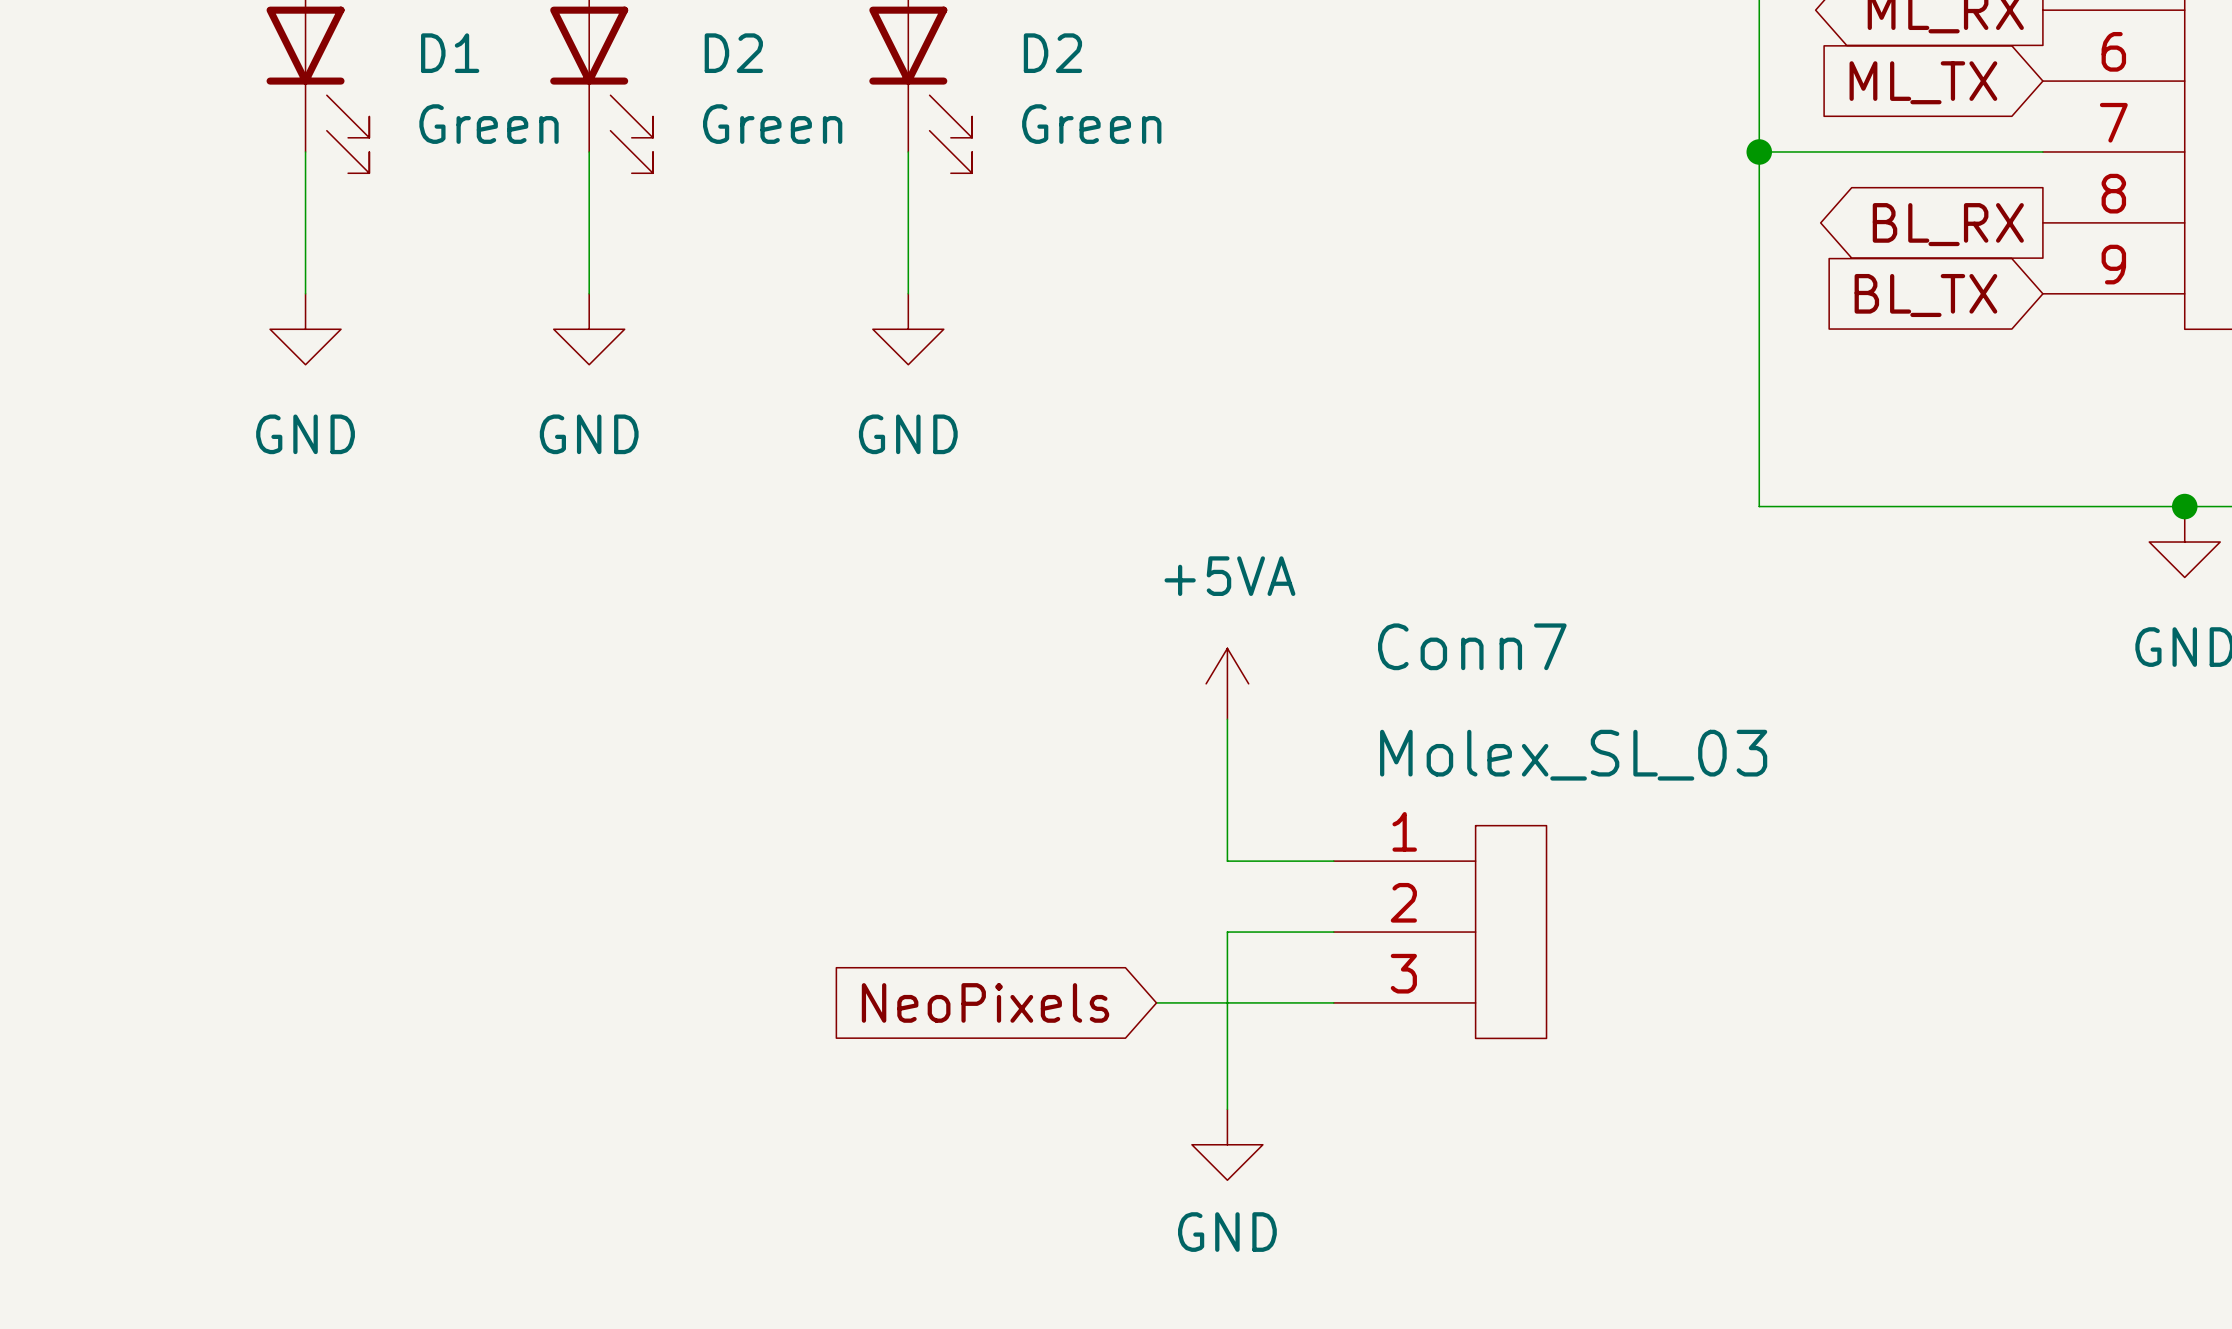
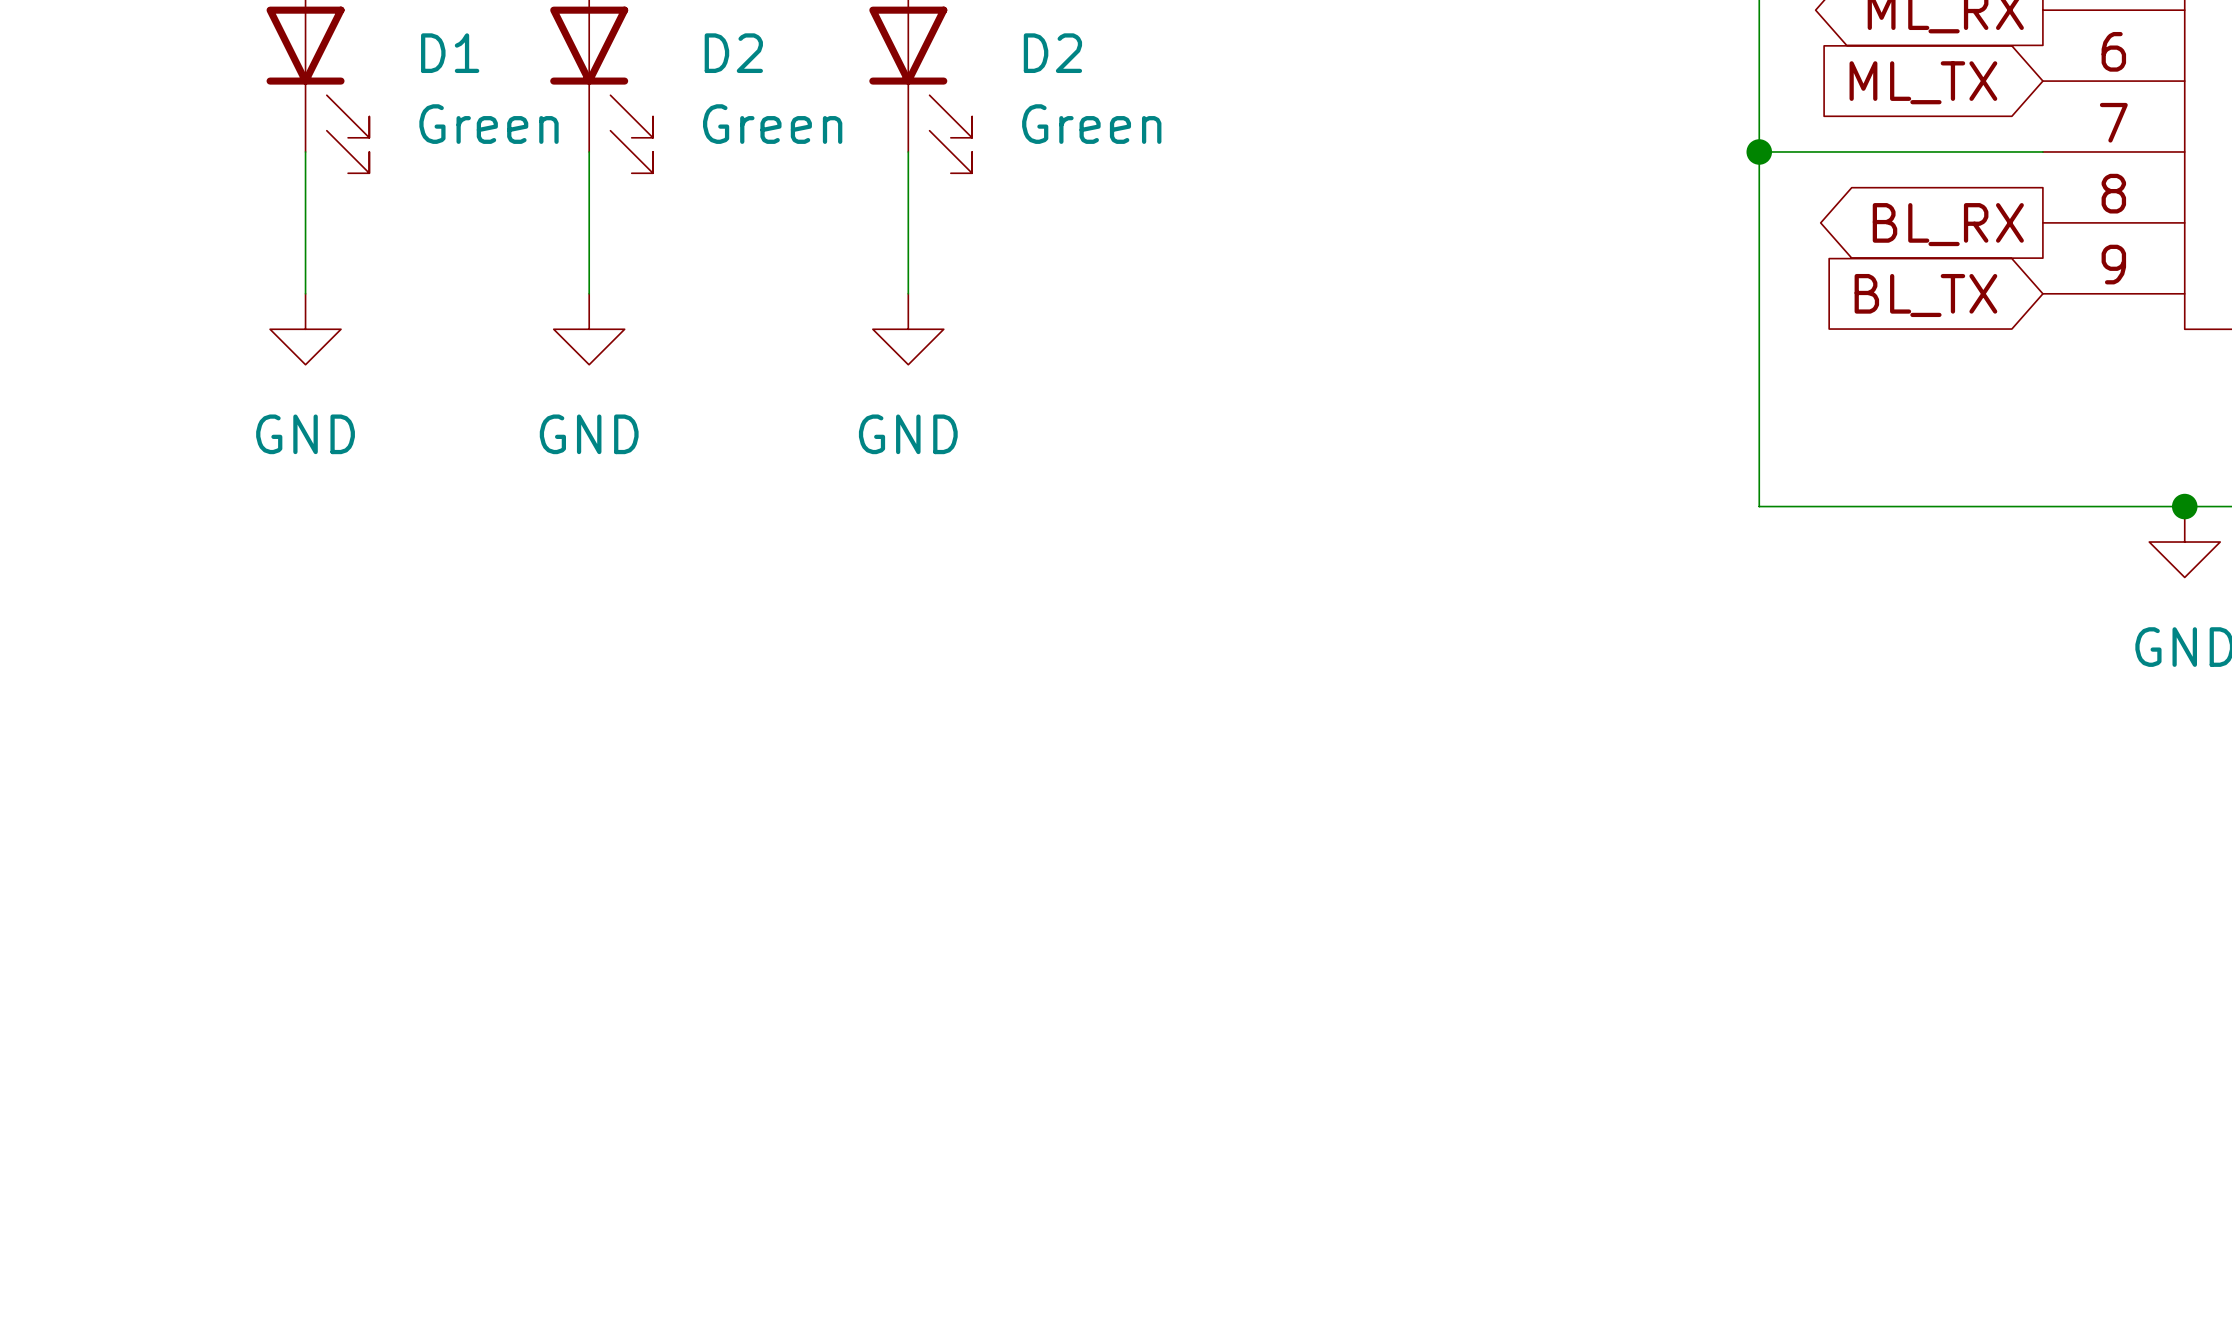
power symbol: +5VA (1227, 683) -> none
wire: (1227, 719) (1227, 861) (1333, 861) -> none
wire: (1333, 932) (1227, 932) (1227, 1109) -> none
Conn7: Molex_SL_03 (1440, 932) -> none
global label: NeoPixels (985, 1002) -> none
wire: (1156, 1002) (1333, 1002) -> none
power symbol: GND (1227, 1144) -> none

